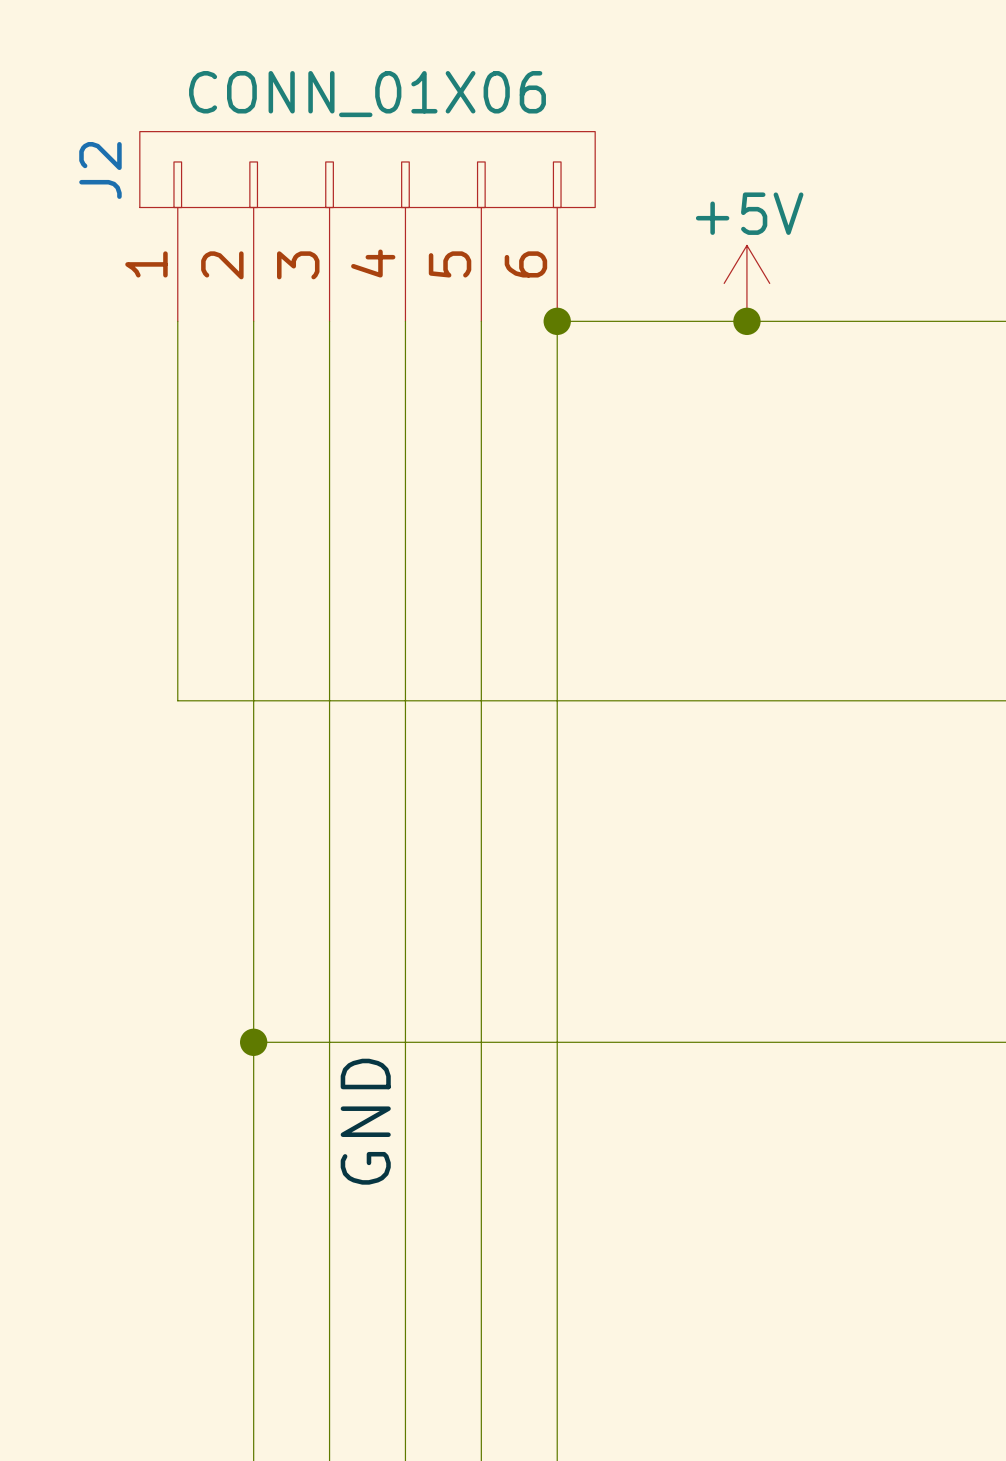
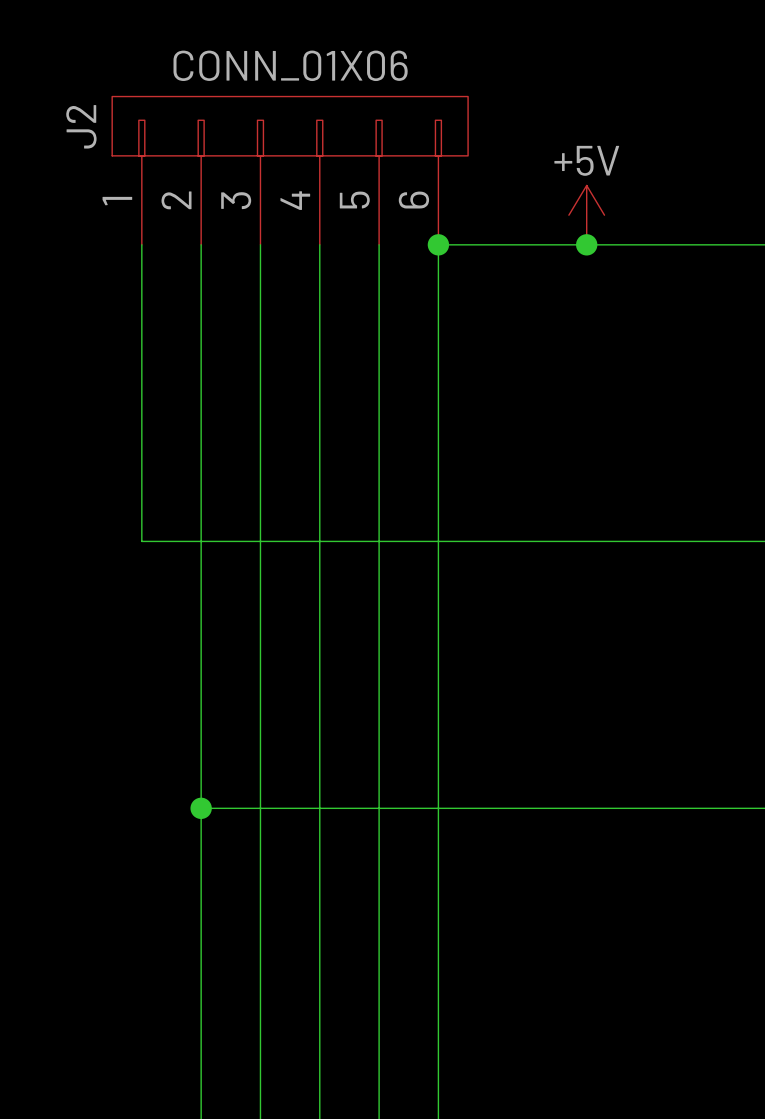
label: GND (365, 1121) -> none

